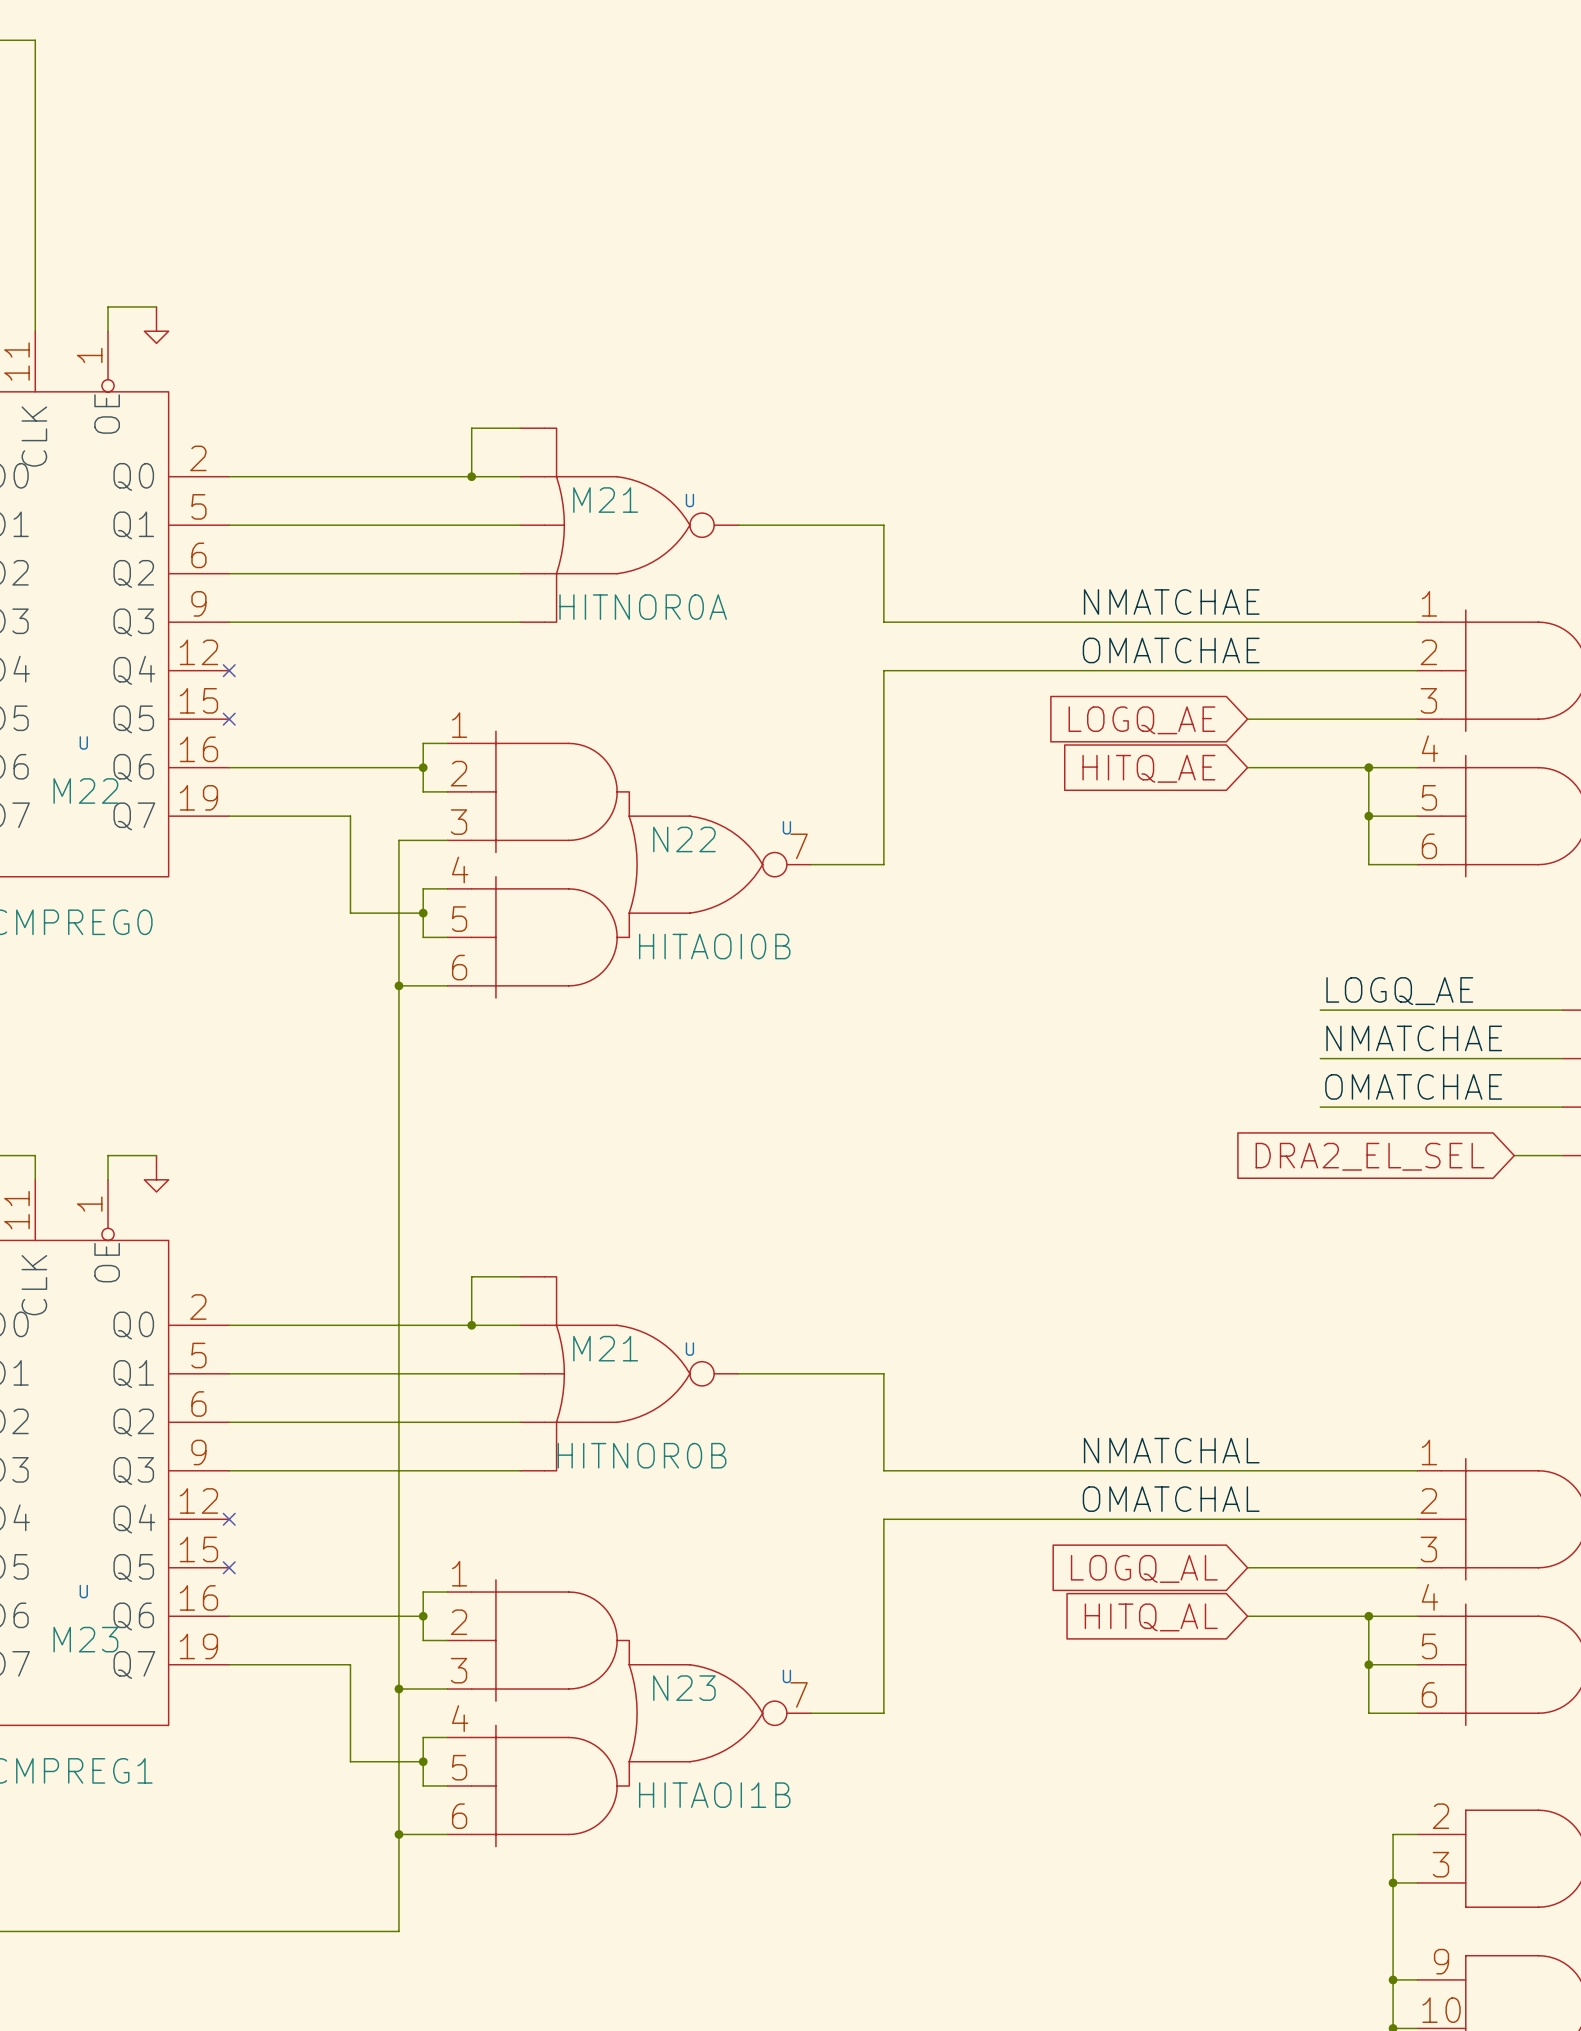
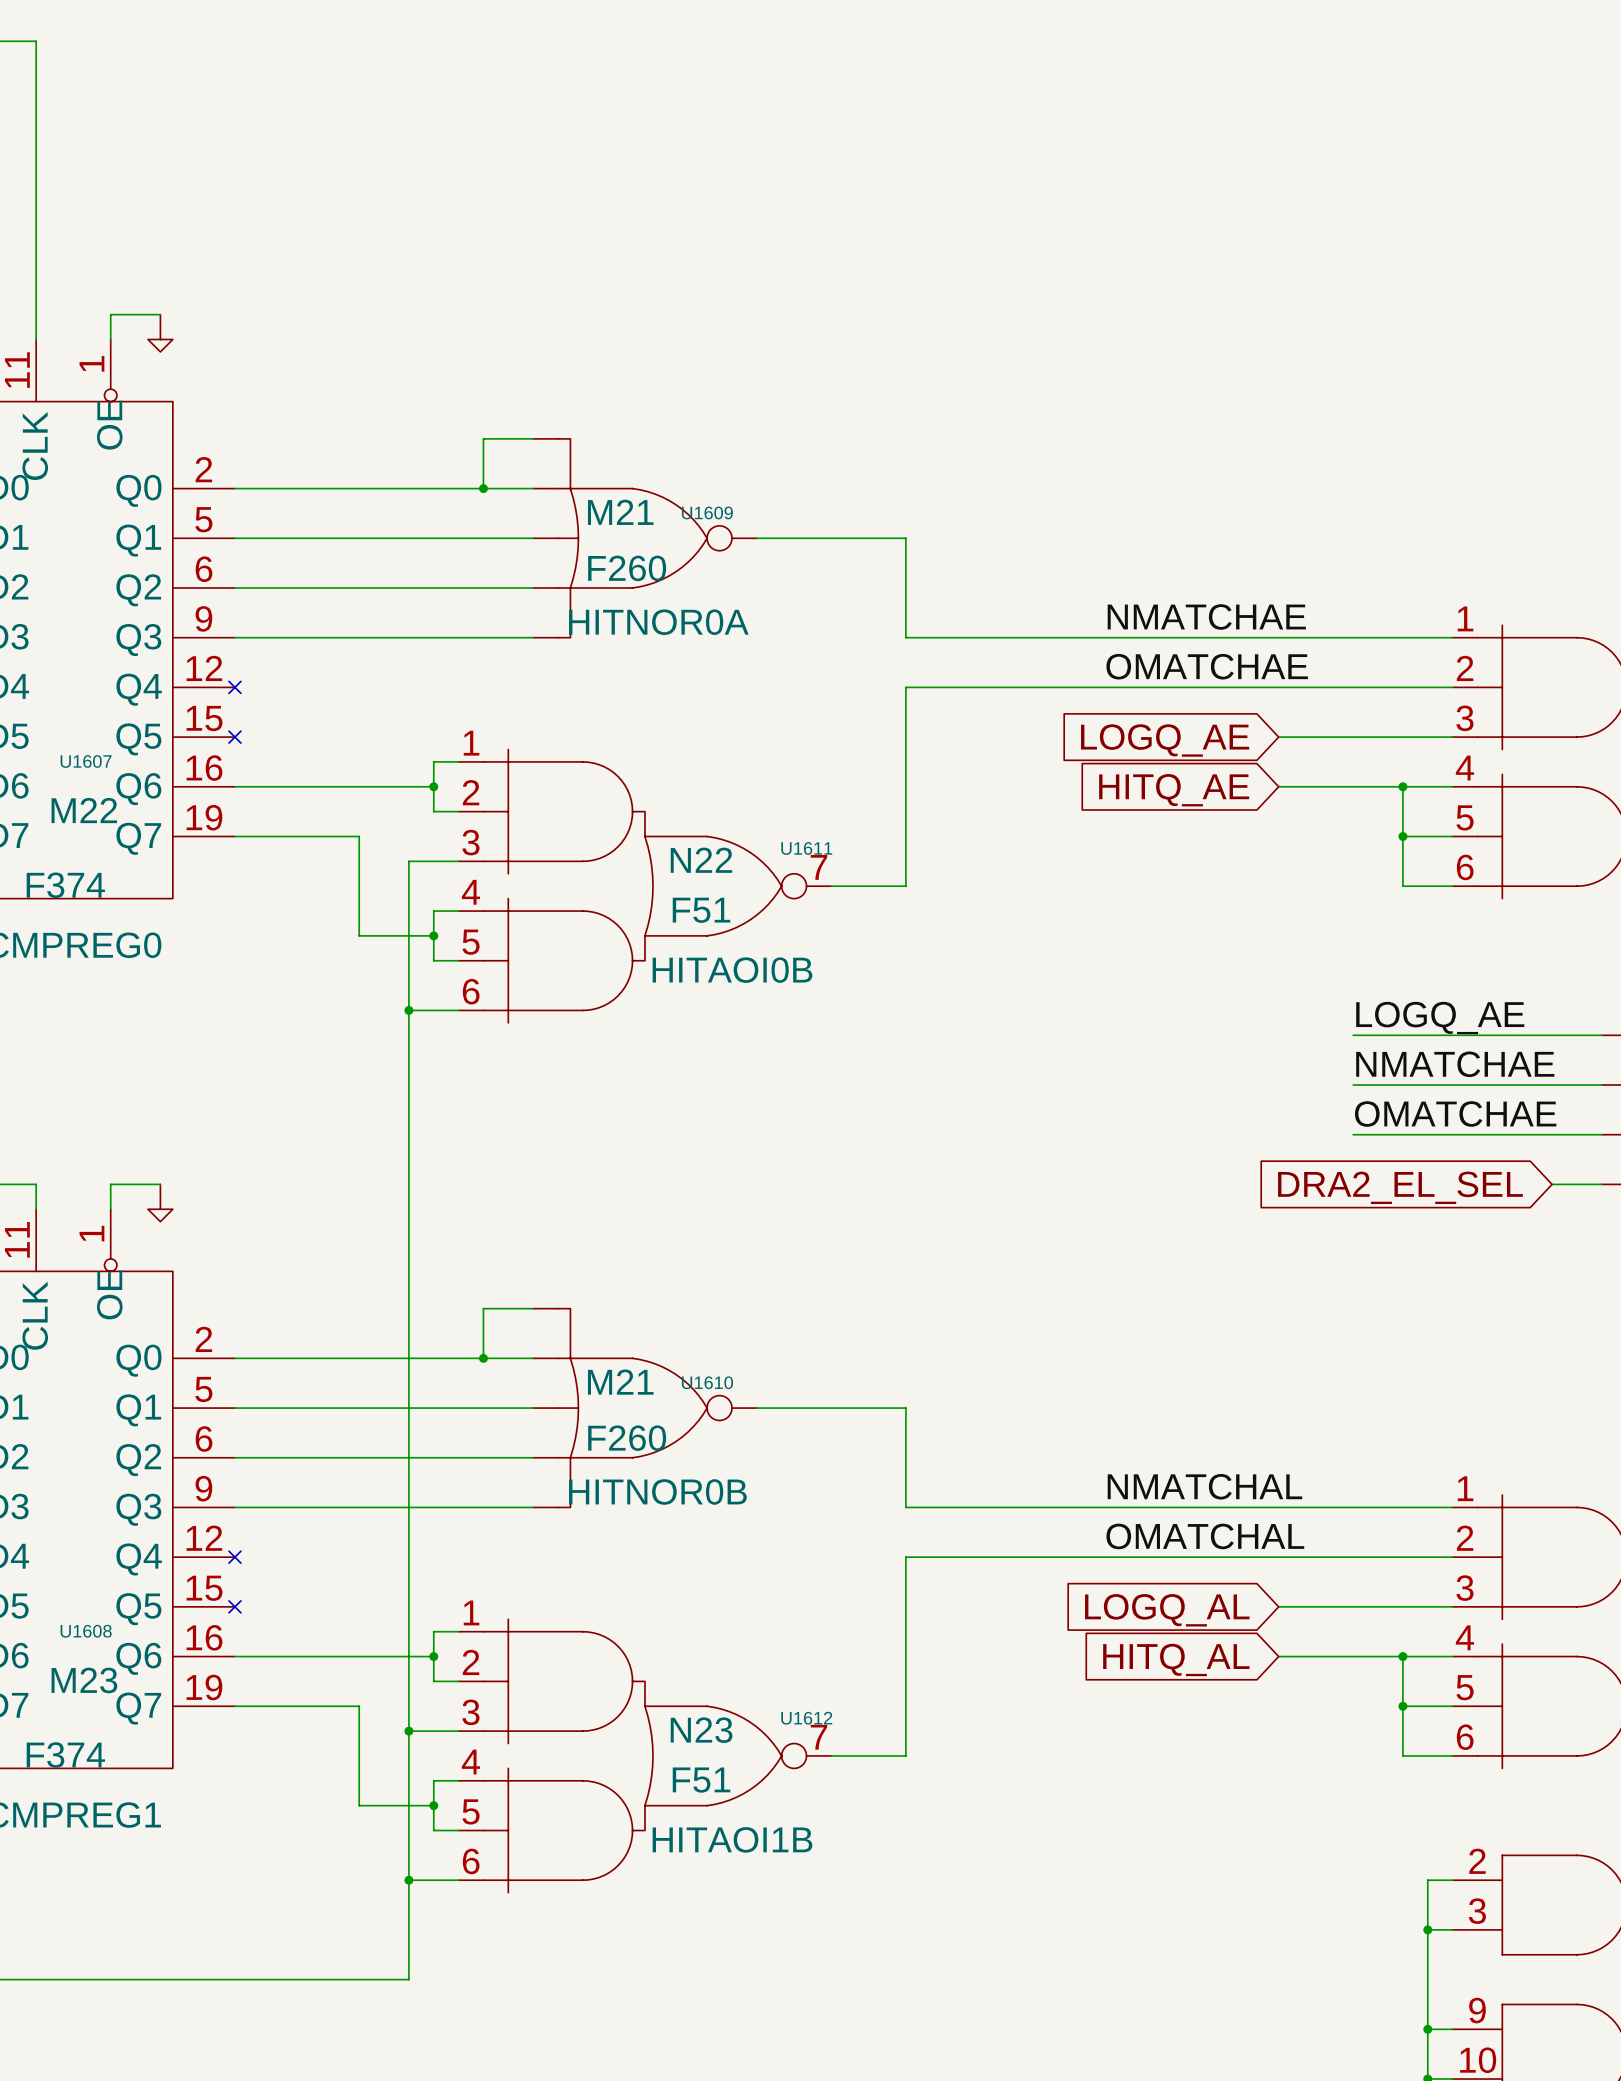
U name: U (689, 500) -> U1609 (707, 512)
U value: none -> F260 (627, 568)
U name: U (83, 742) -> U1607 (86, 761)
U name: U (786, 827) -> U1611 (806, 848)
U value: none -> F374 (65, 885)
U value: none -> F51 (701, 910)
U name: U (689, 1349) -> U1610 (707, 1382)
U value: none -> F260 (627, 1438)
U name: U (83, 1591) -> U1608 (86, 1631)
U name: U (786, 1676) -> U1612 (806, 1718)
U value: none -> F374 (65, 1755)
U value: none -> F51 (701, 1780)

